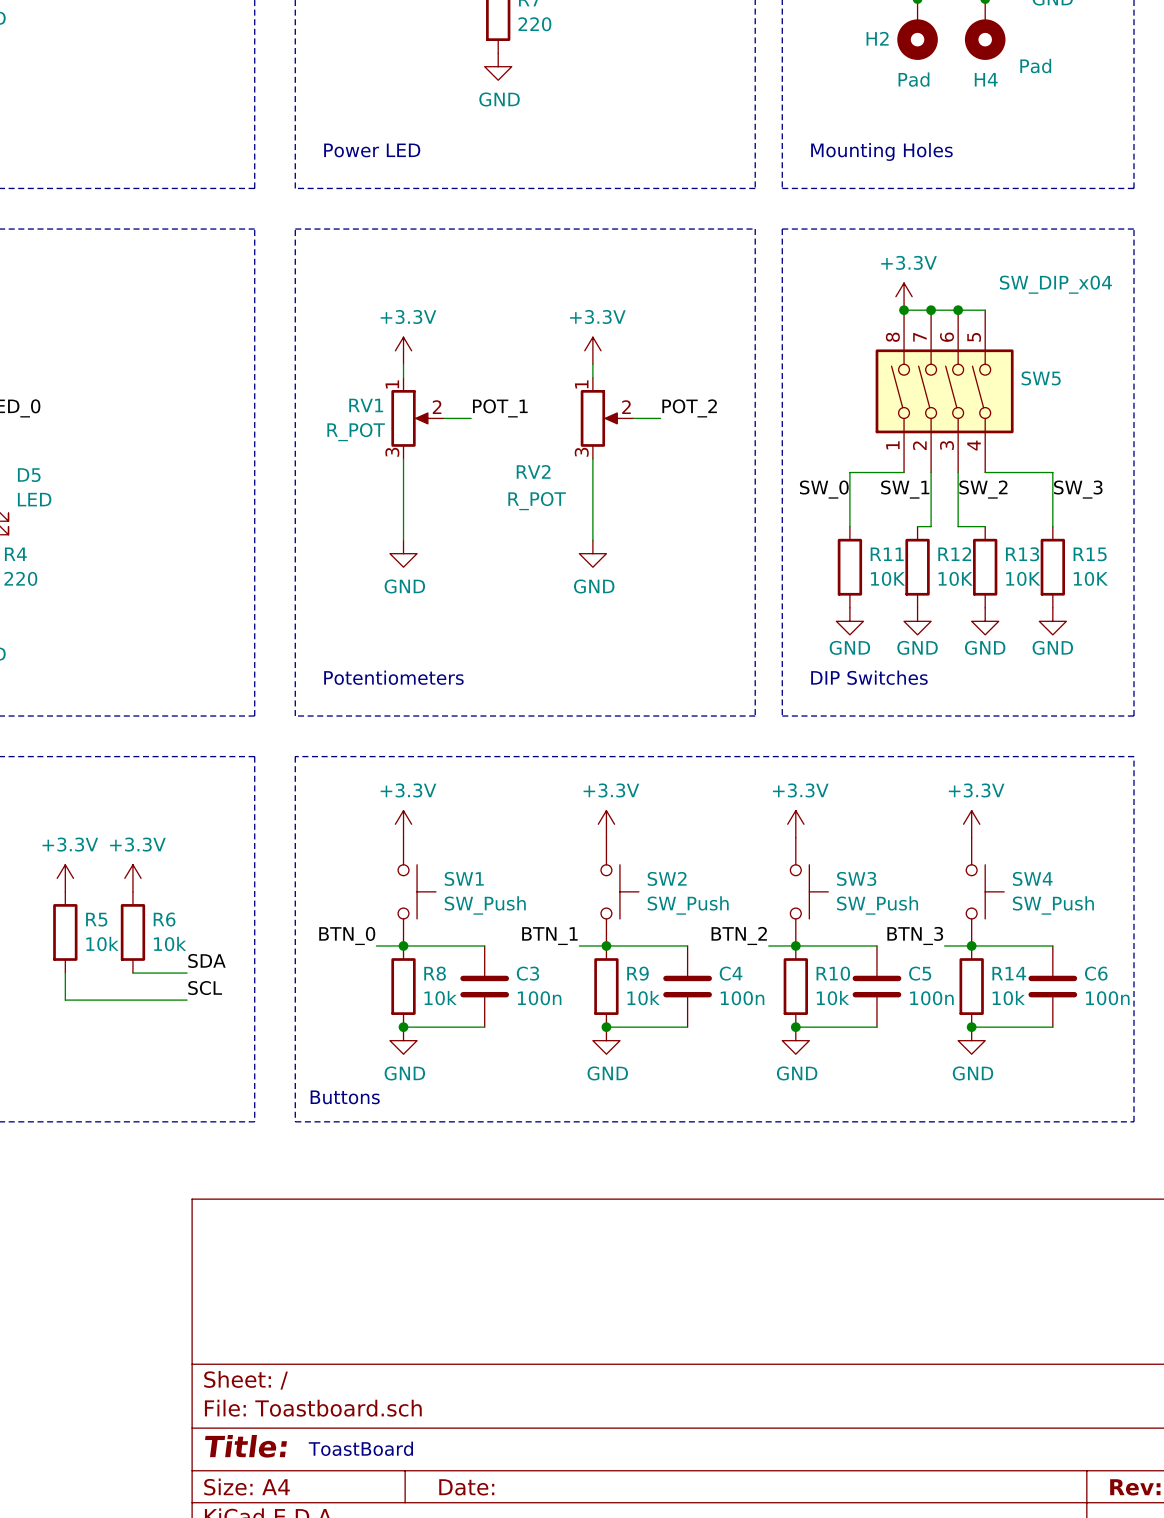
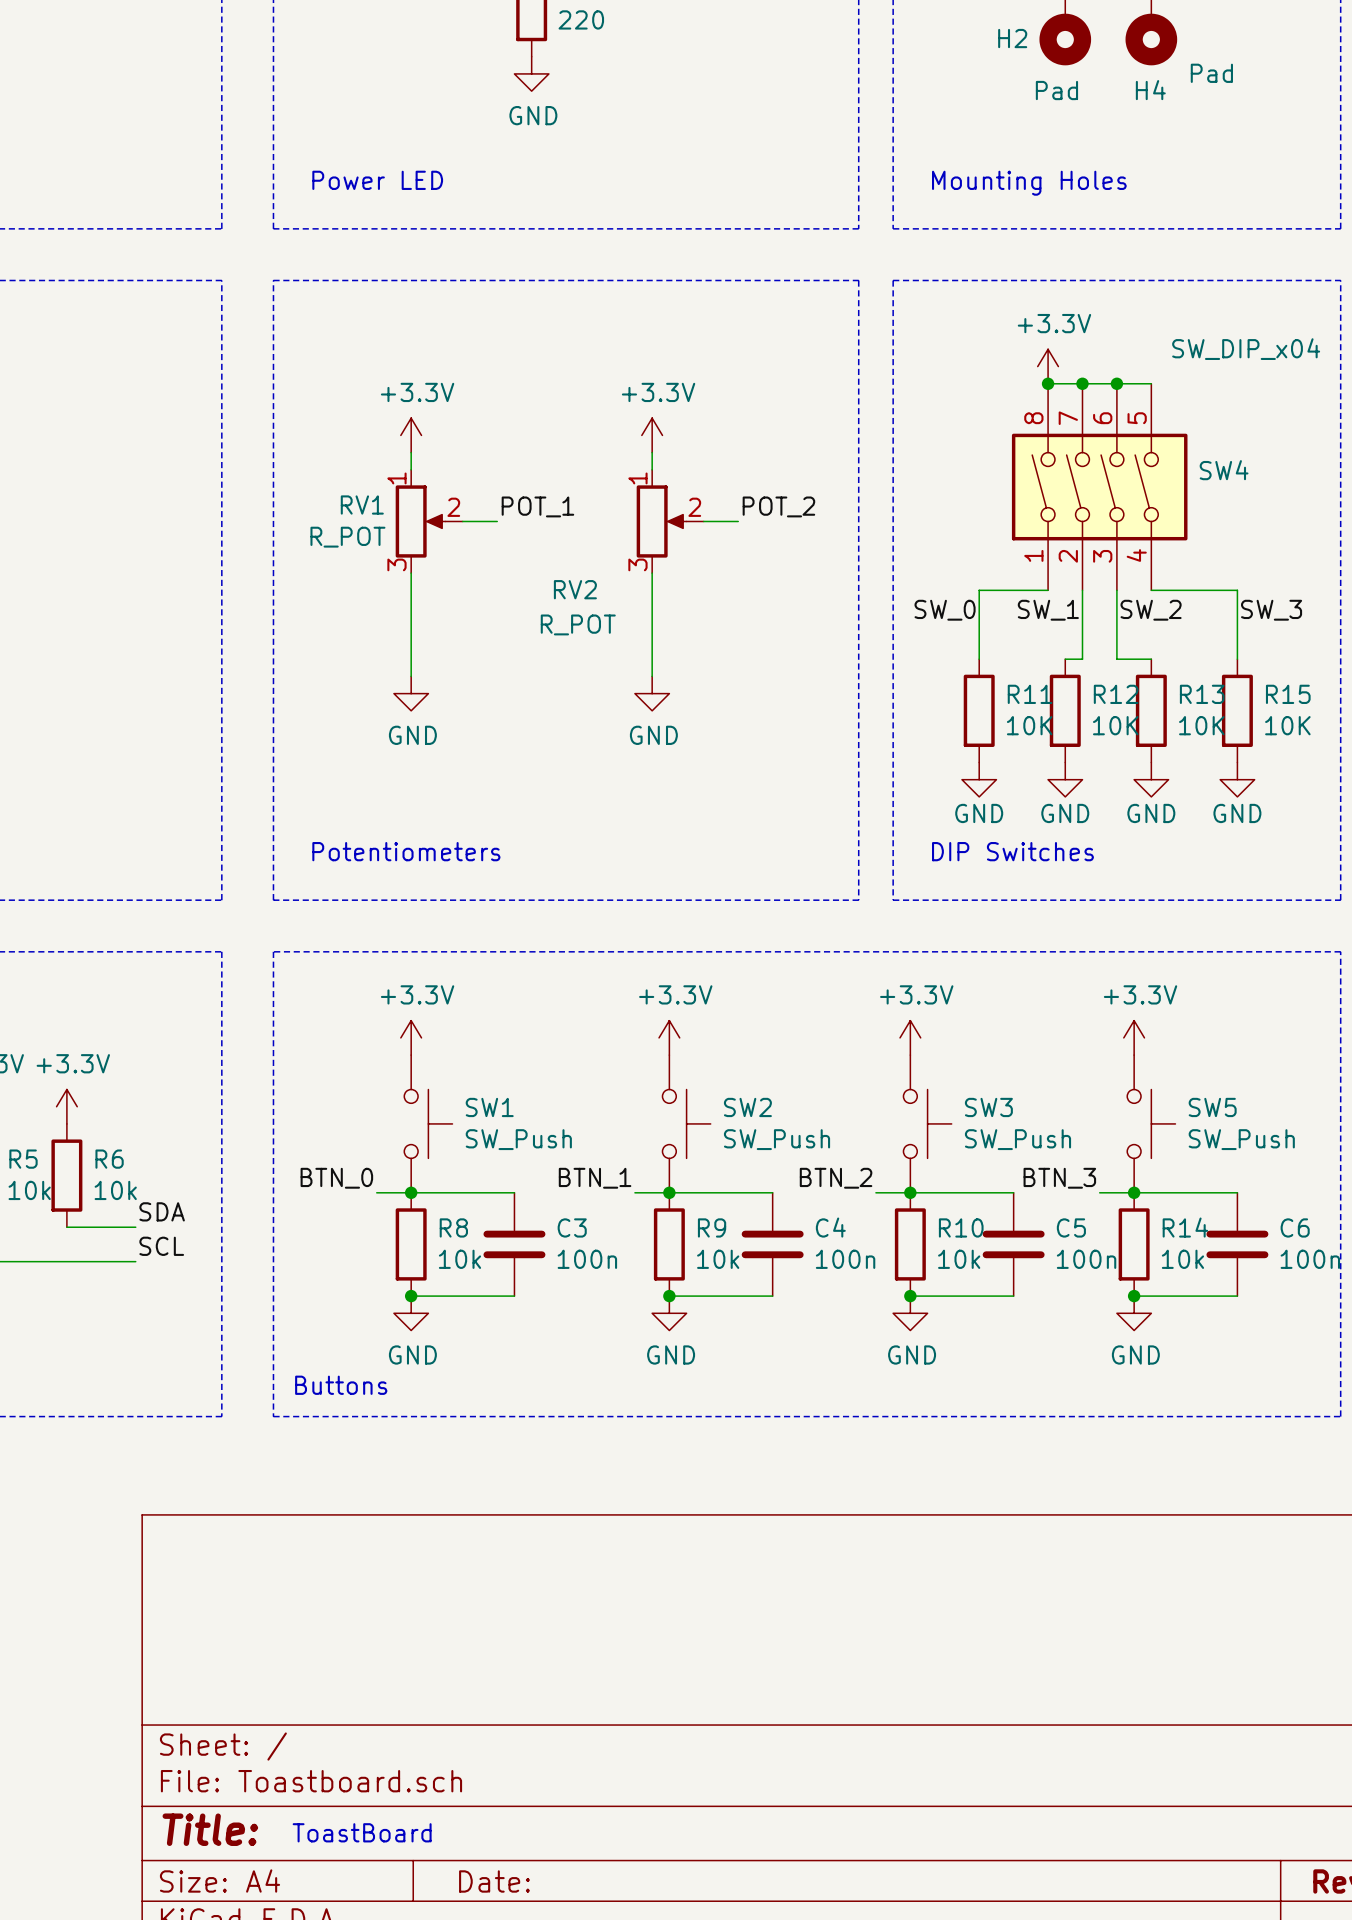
SW5 name: SW5 (1041, 378) -> SW4 (1224, 470)
SW4 name: SW4 (1032, 878) -> SW5 (1212, 1107)

